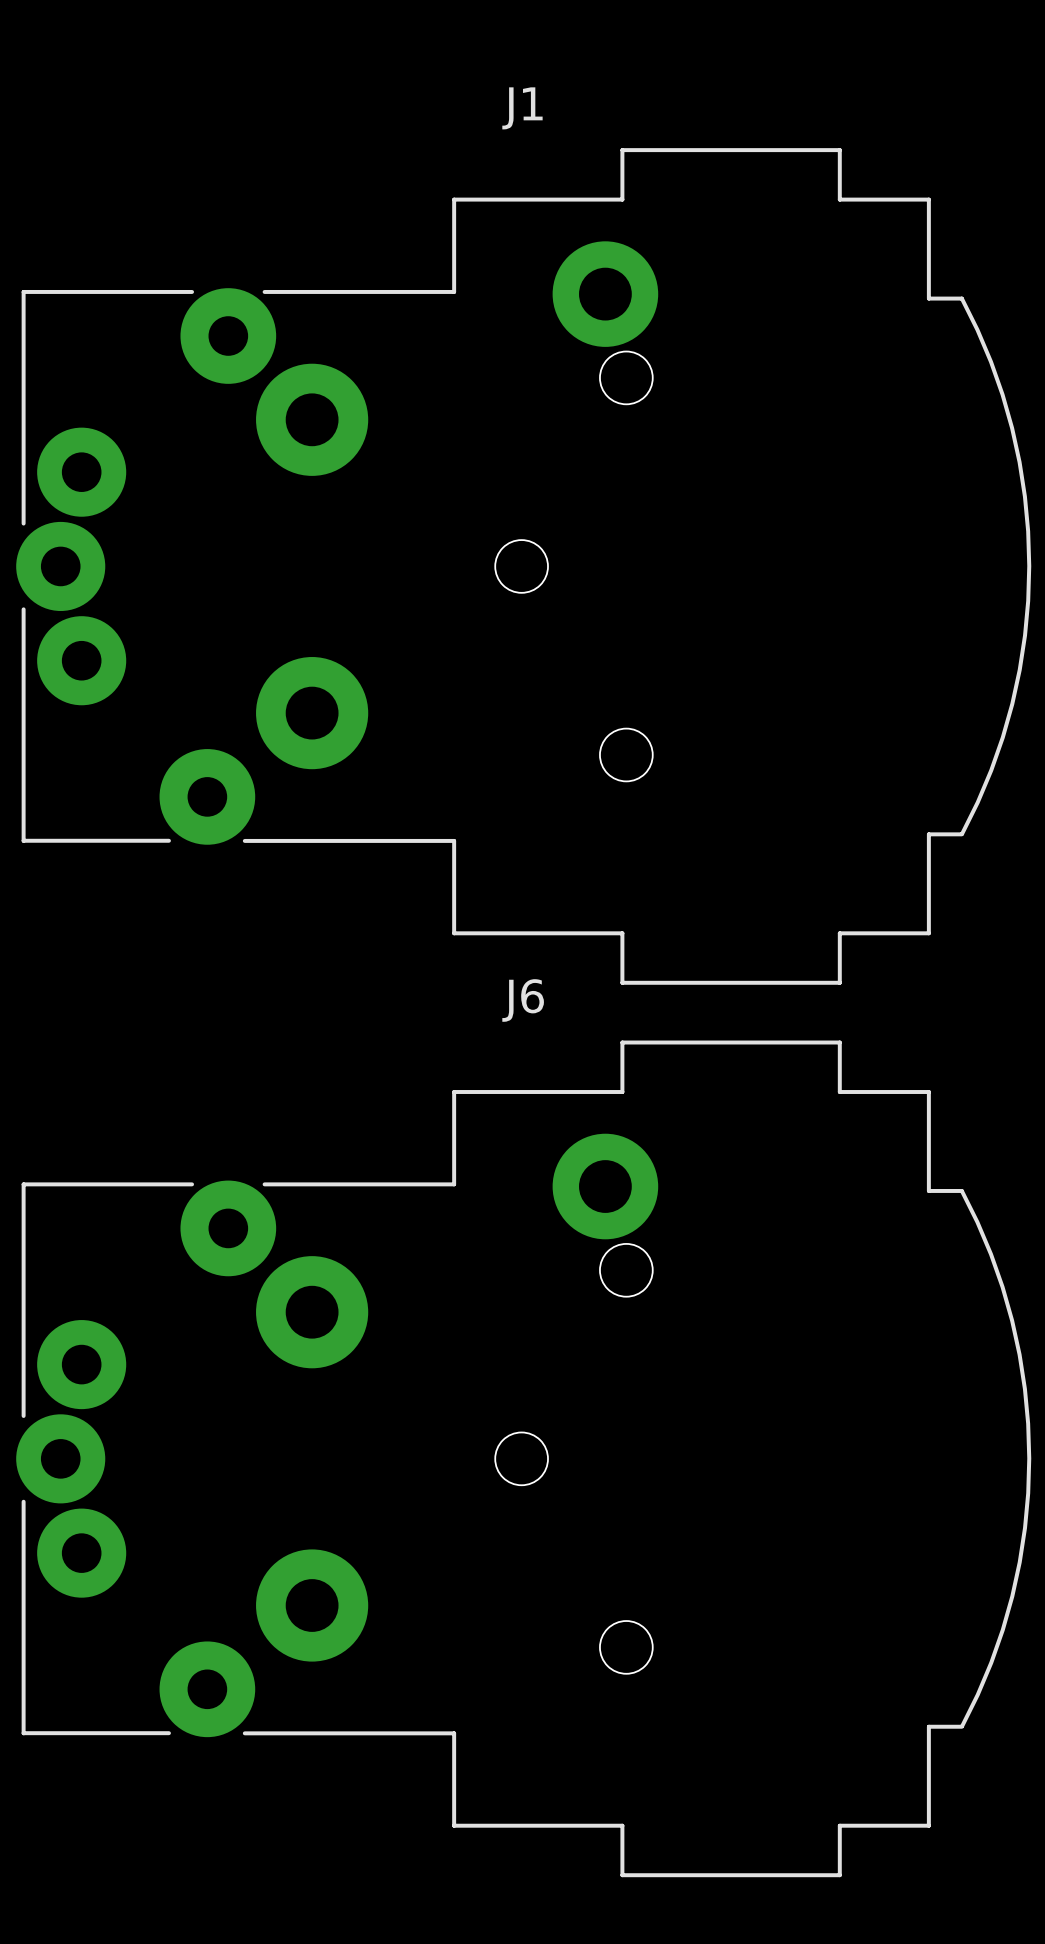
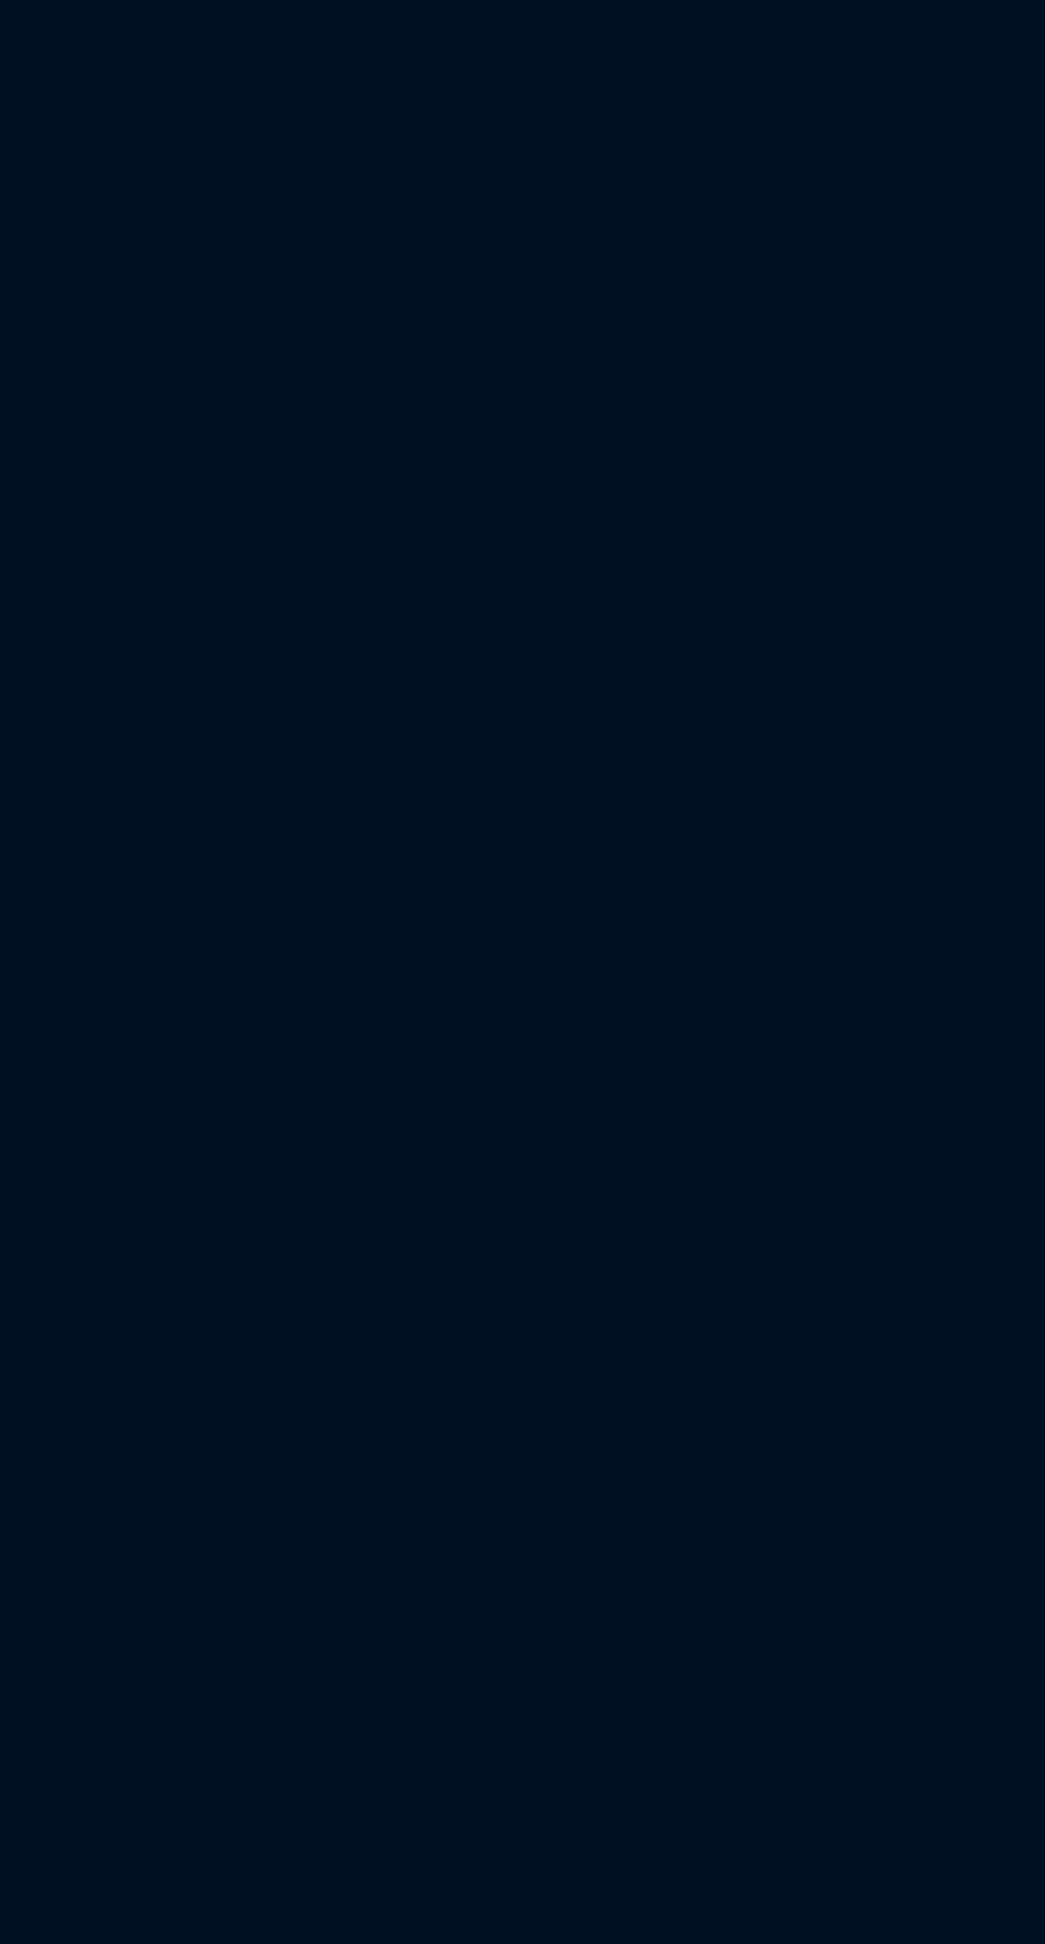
J1: (523, 566) -> none
J6: (523, 1458) -> none

